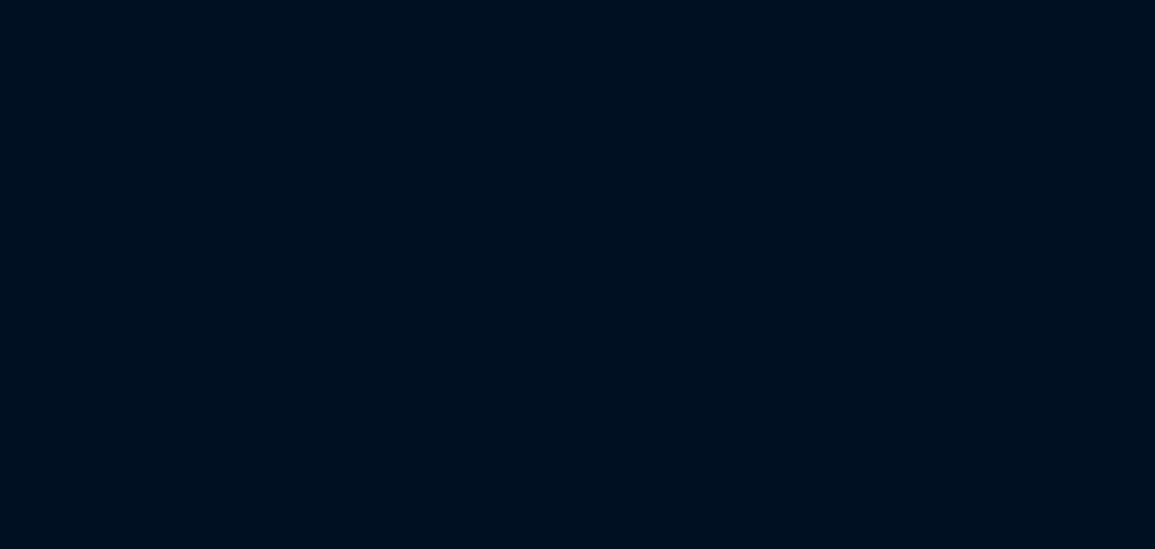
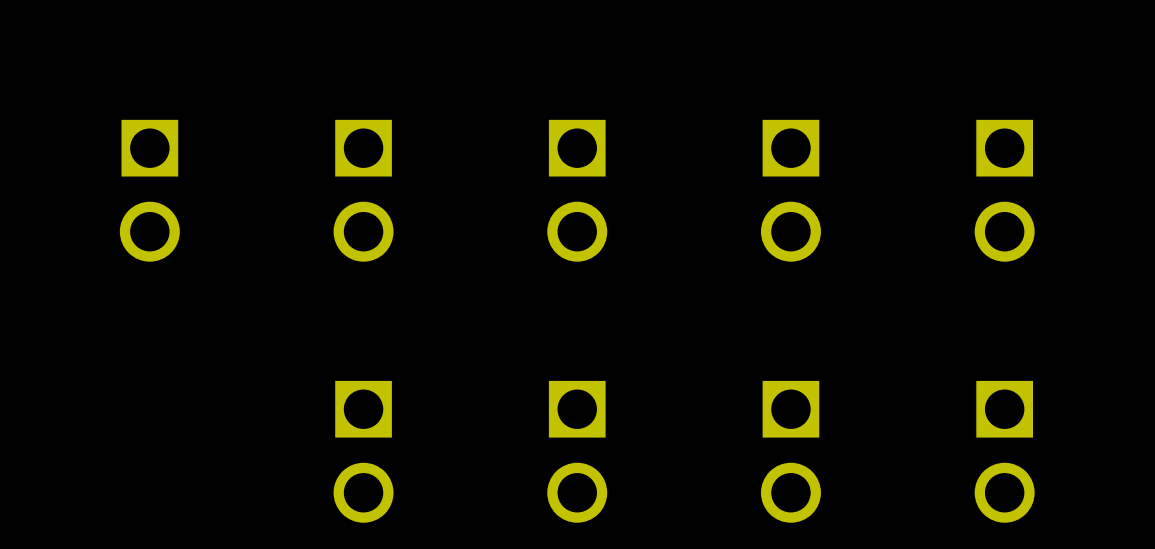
part: none -> (149, 190)
part: none -> (363, 190)
part: none -> (577, 190)
part: none -> (790, 190)
part: none -> (1004, 190)
part: none -> (363, 451)
part: none -> (577, 451)
part: none -> (790, 451)
part: none -> (1004, 451)

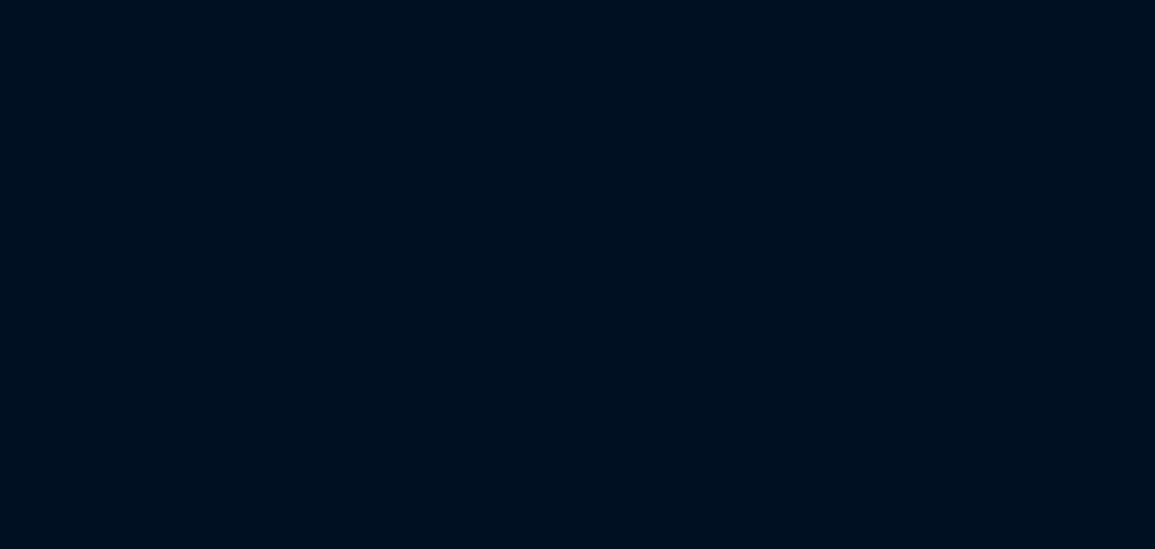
part: (149, 190) -> none
part: (363, 190) -> none
part: (577, 190) -> none
part: (790, 190) -> none
part: (1004, 190) -> none
part: (363, 451) -> none
part: (577, 451) -> none
part: (790, 451) -> none
part: (1004, 451) -> none

